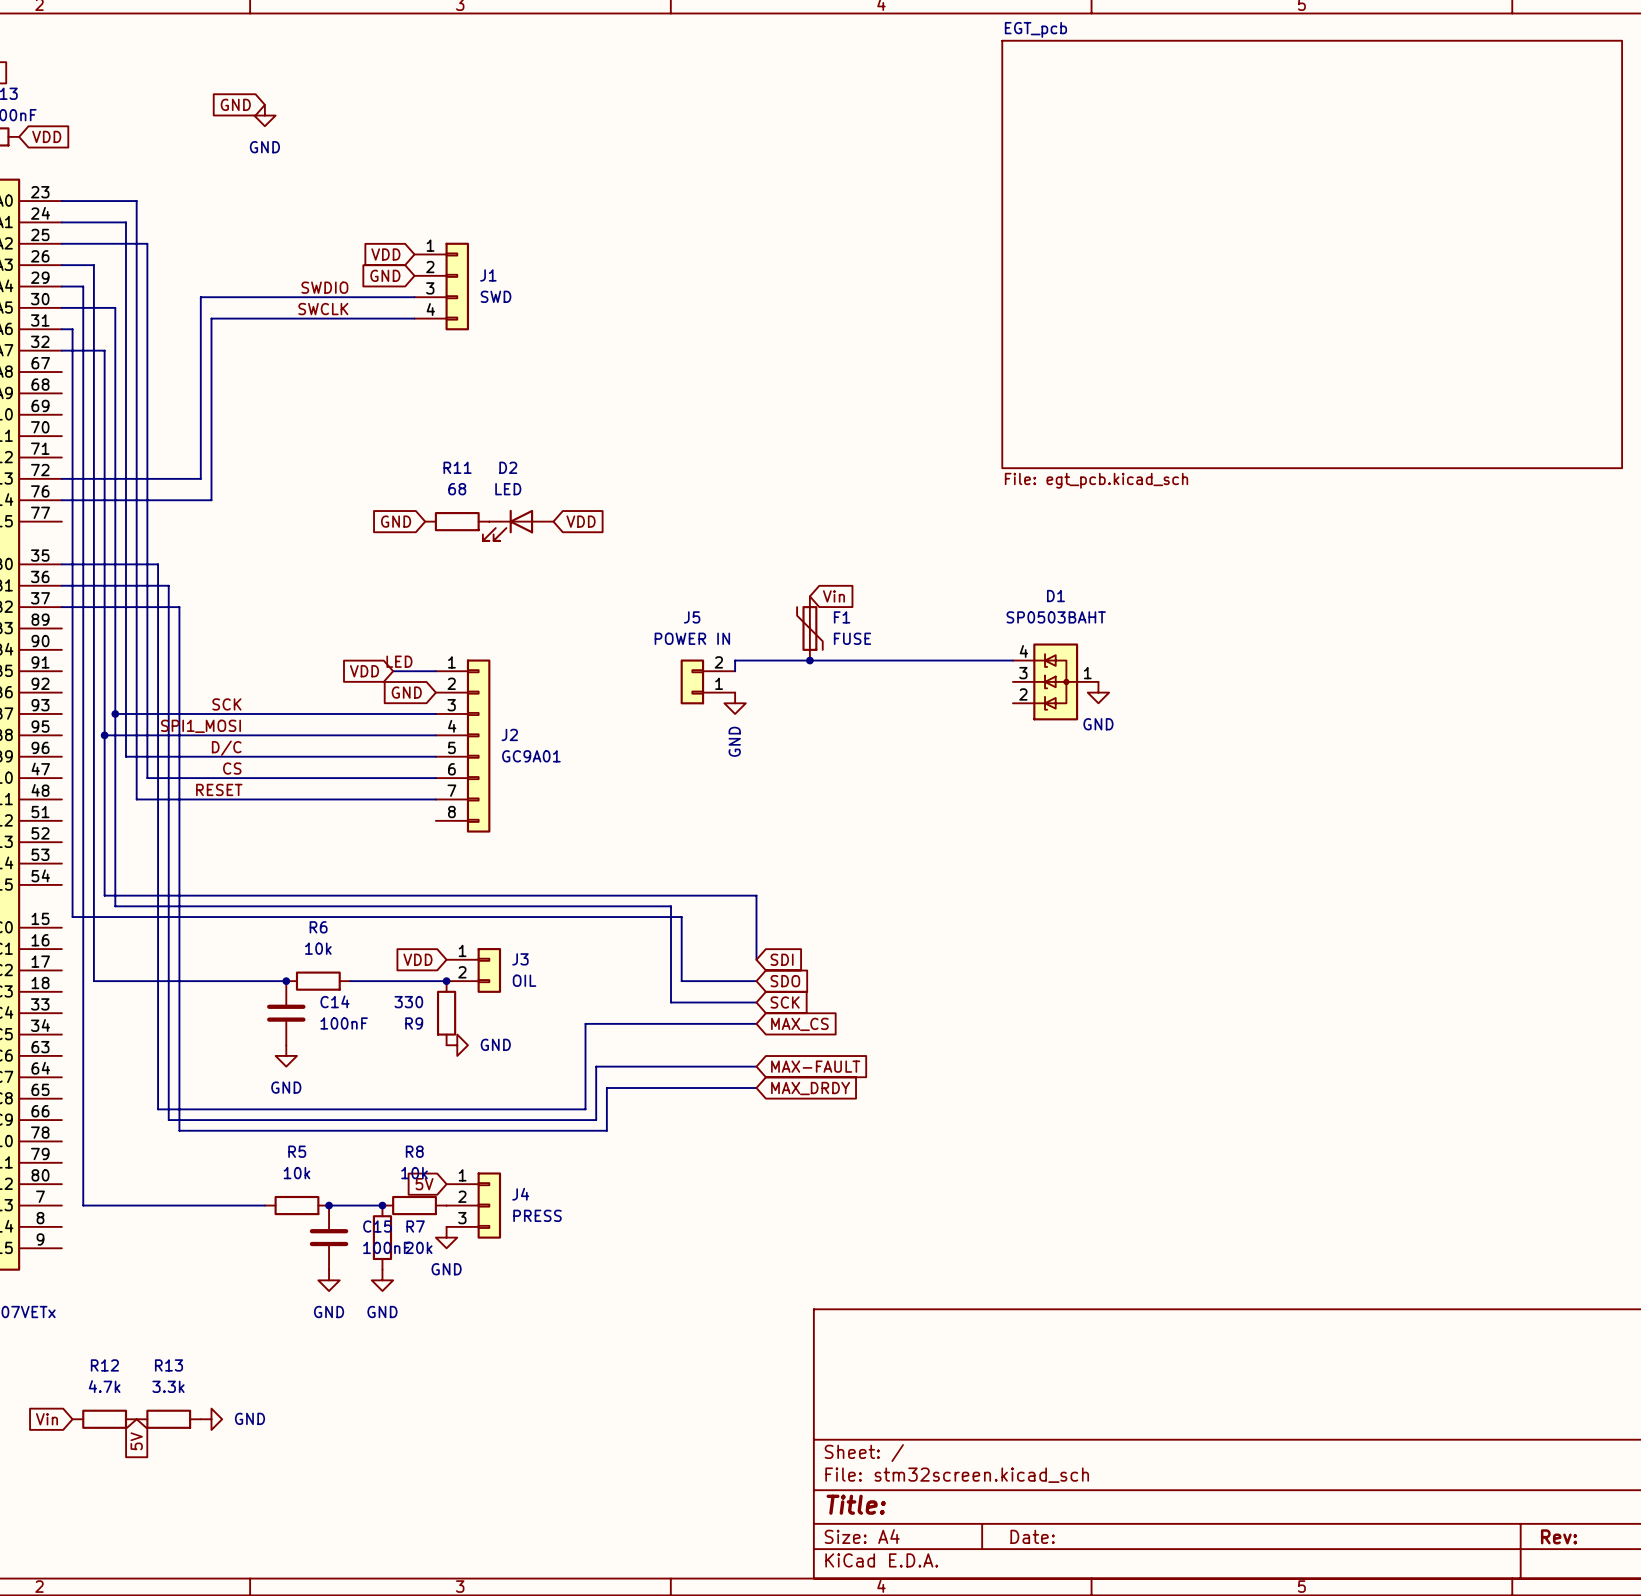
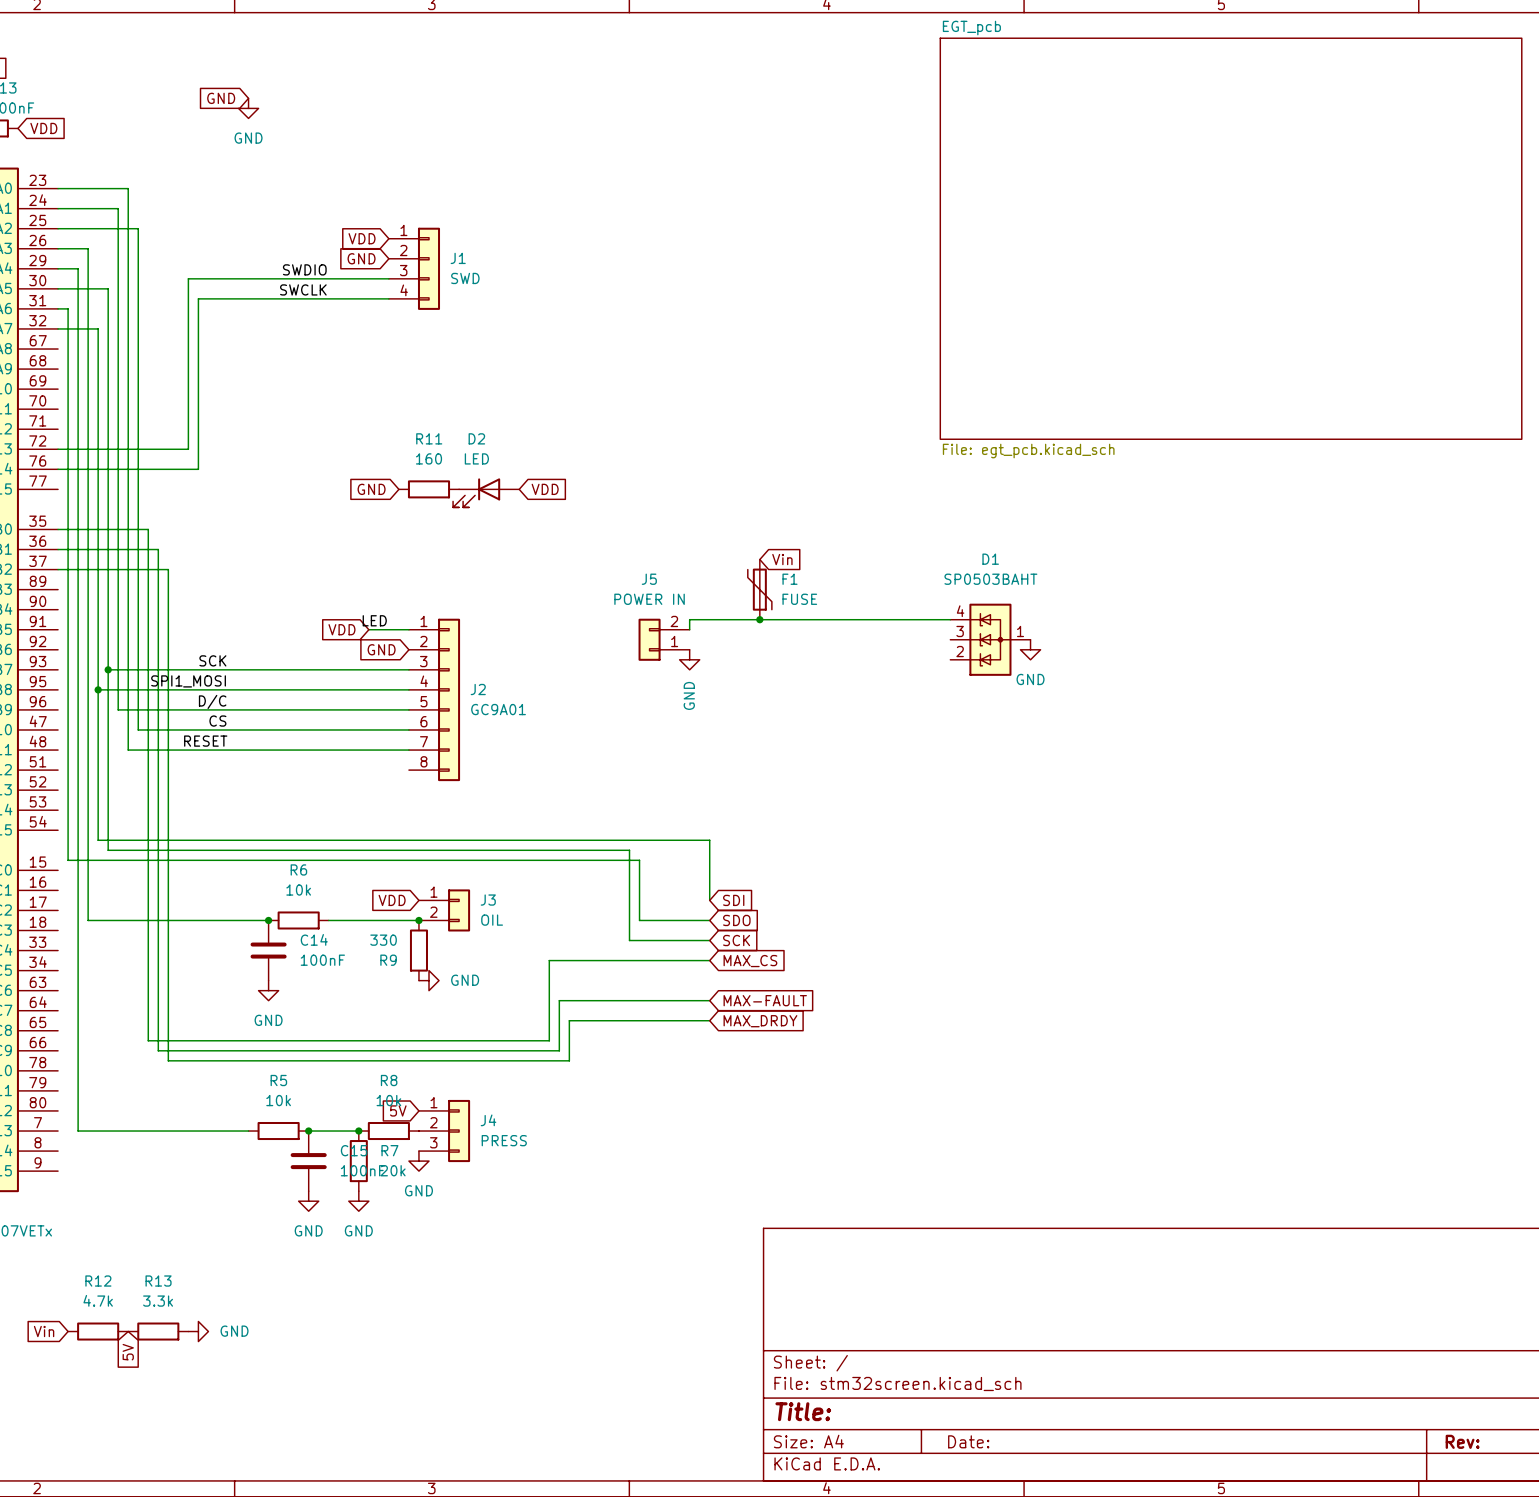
R11 value: 68 (457, 489) -> 160 (429, 458)

